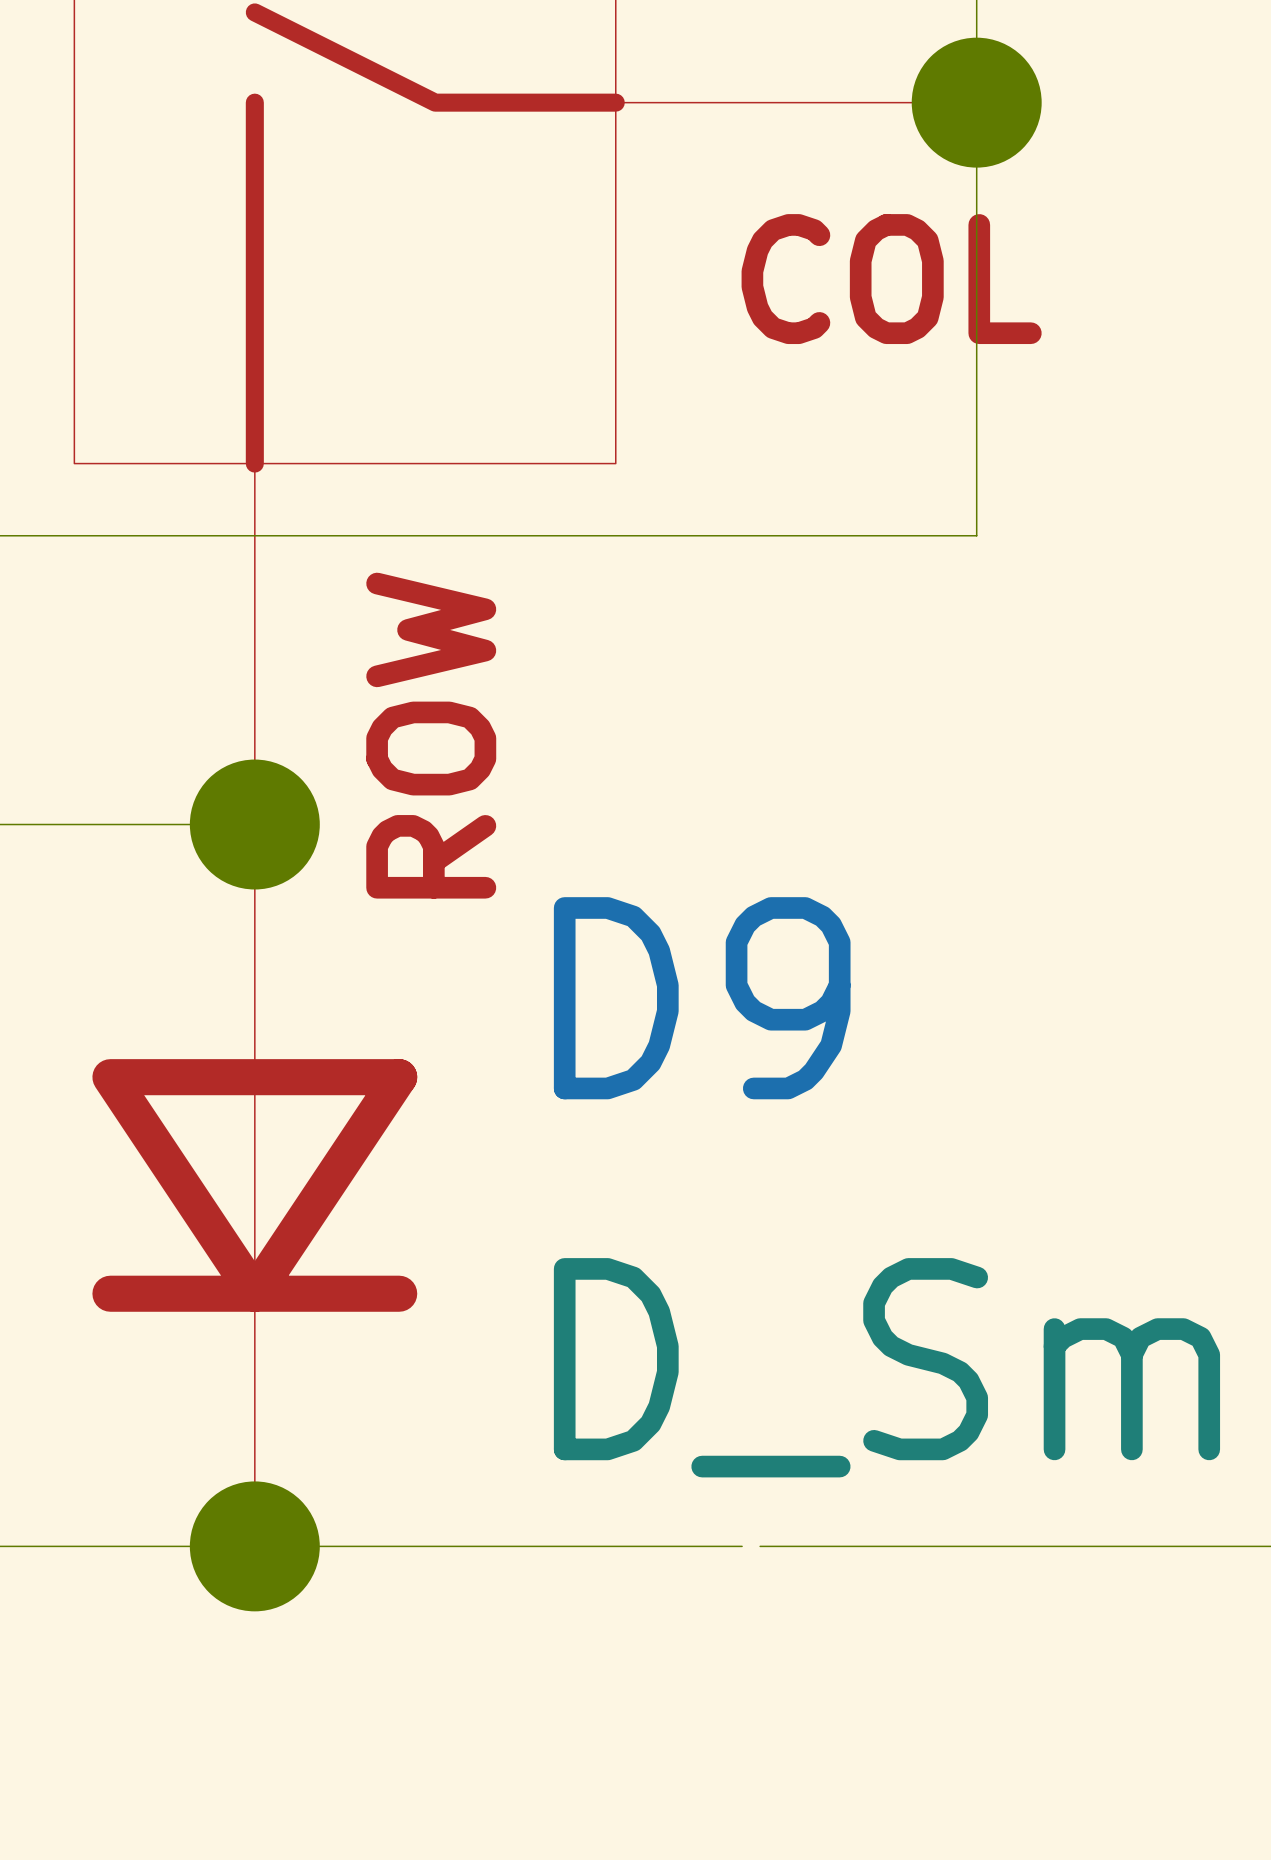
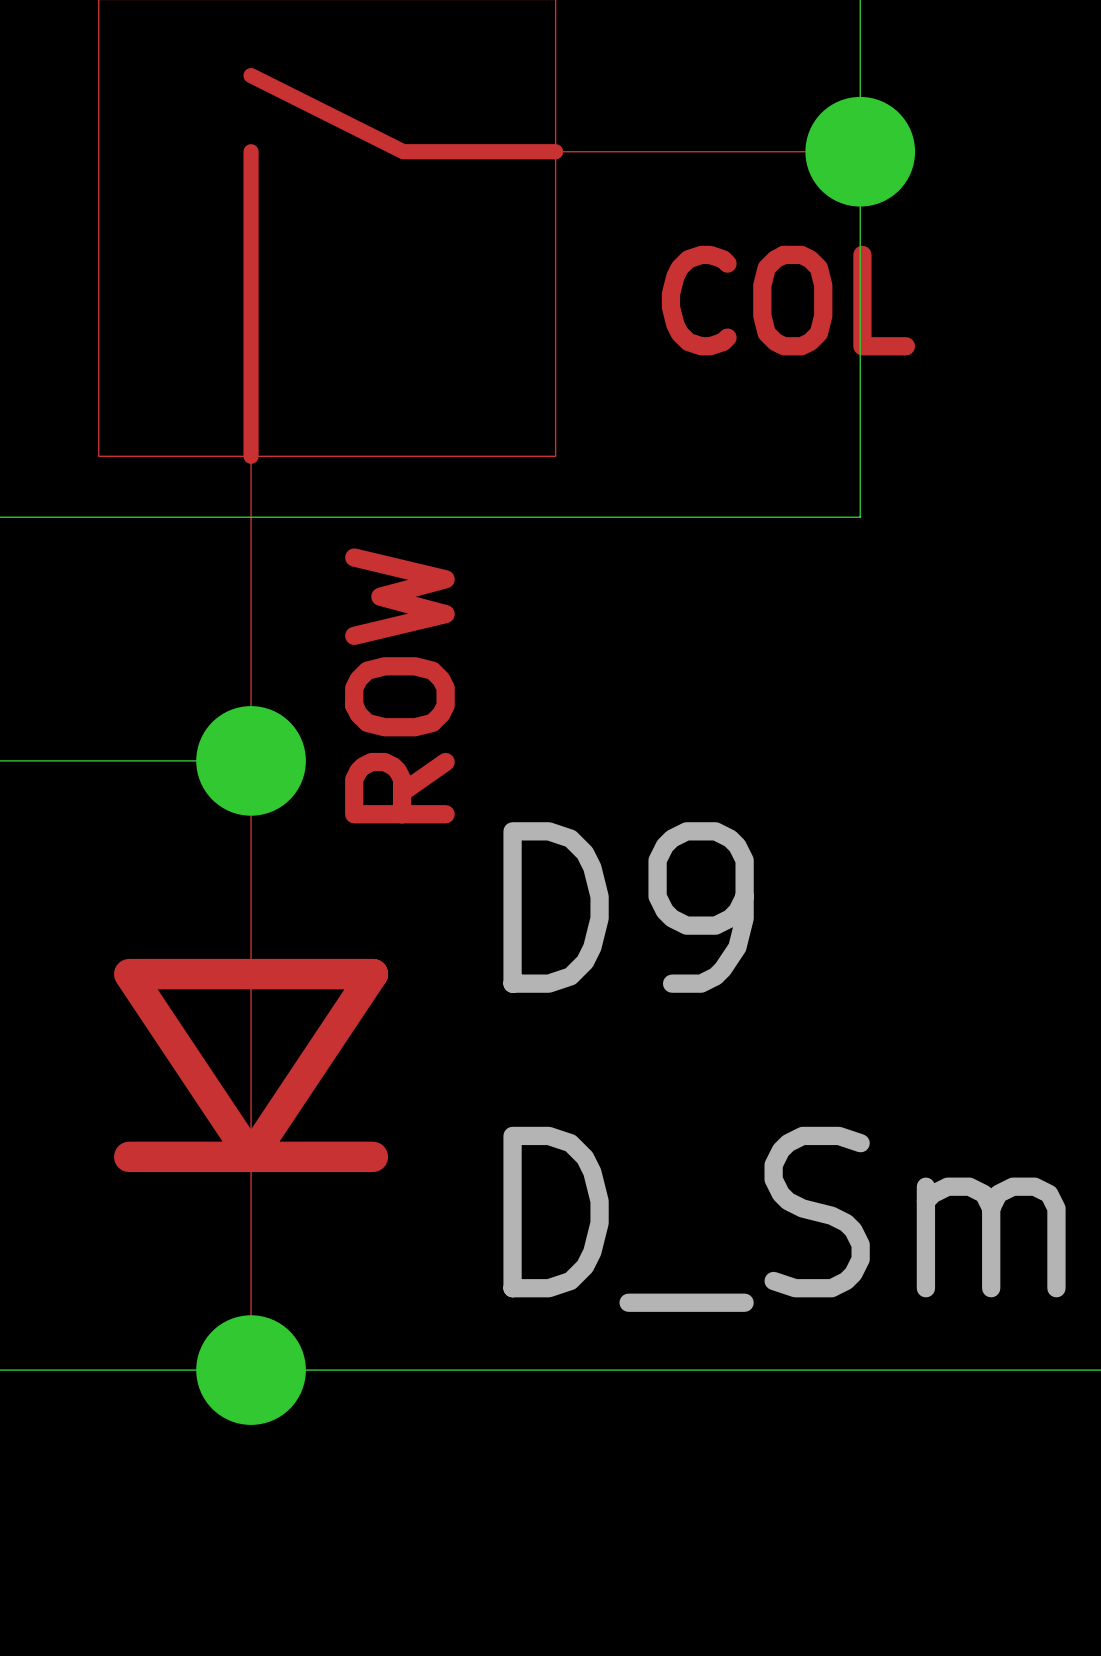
wire: none -> (662, 1370) (677, 1370)

